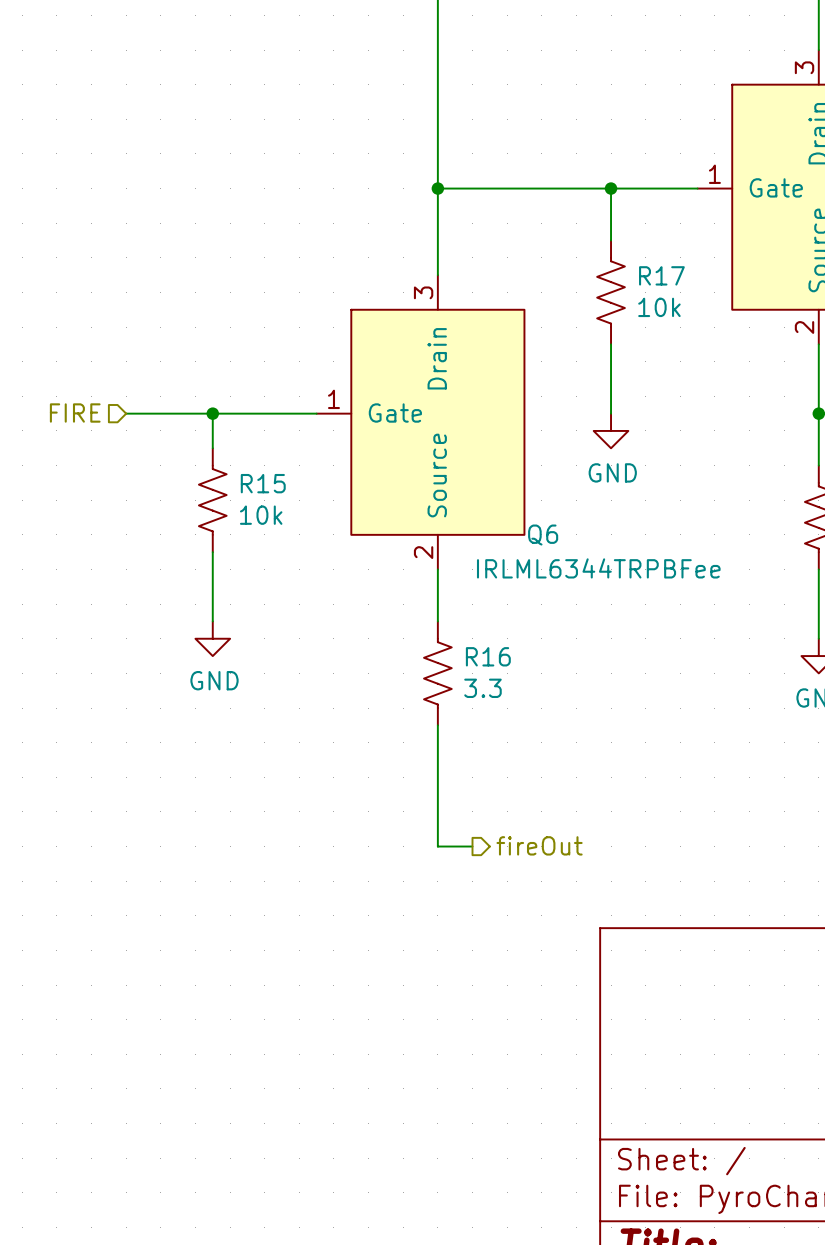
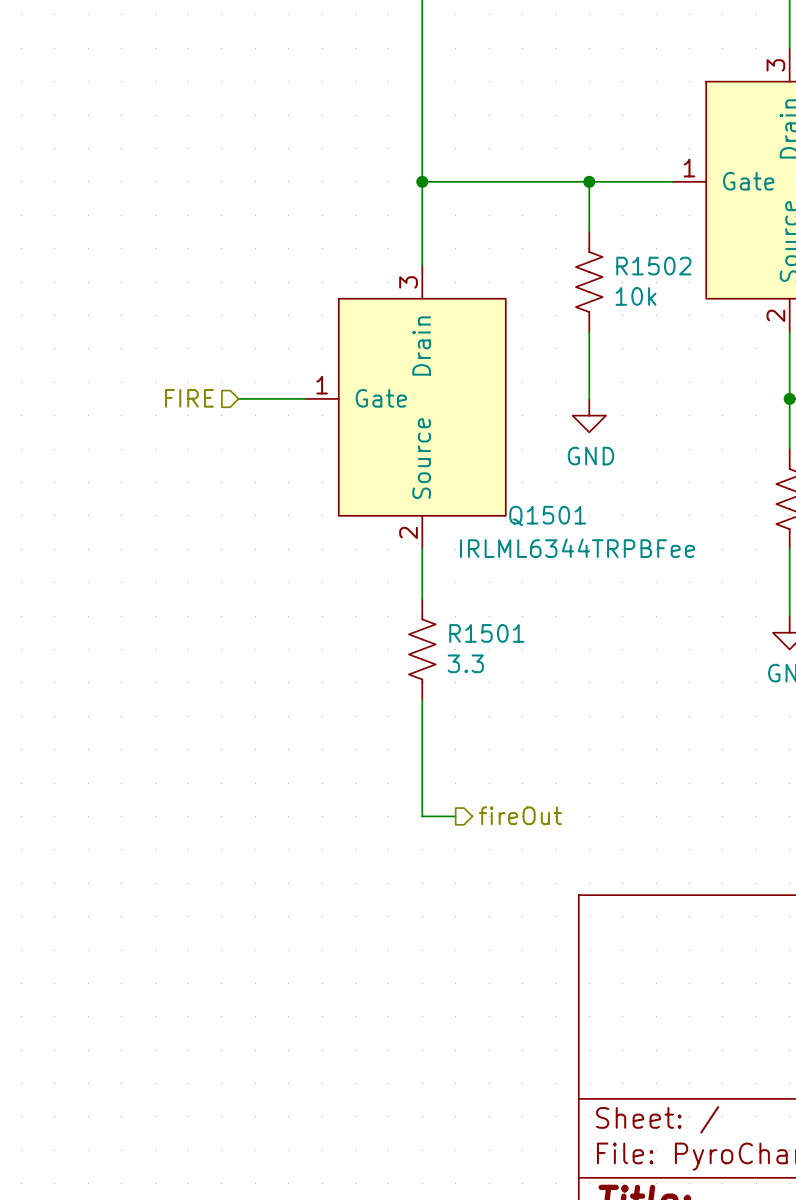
R17 name: R17 (661, 275) -> R1502 (653, 266)
hierarchical label position: FIRE (75, 413) -> FIRE (189, 398)
wire: (126, 413) (247, 413) -> none
wire: (212, 413) (212, 448) -> none
junction: (212, 413) -> none
R15: 10k (212, 500) -> none
Q6 name: Q6 (543, 535) -> Q1501 (547, 515)
wire: (212, 552) (212, 621) -> none
power symbol: GND (212, 638) -> none
R16 name: R16 (488, 656) -> R1501 (486, 633)

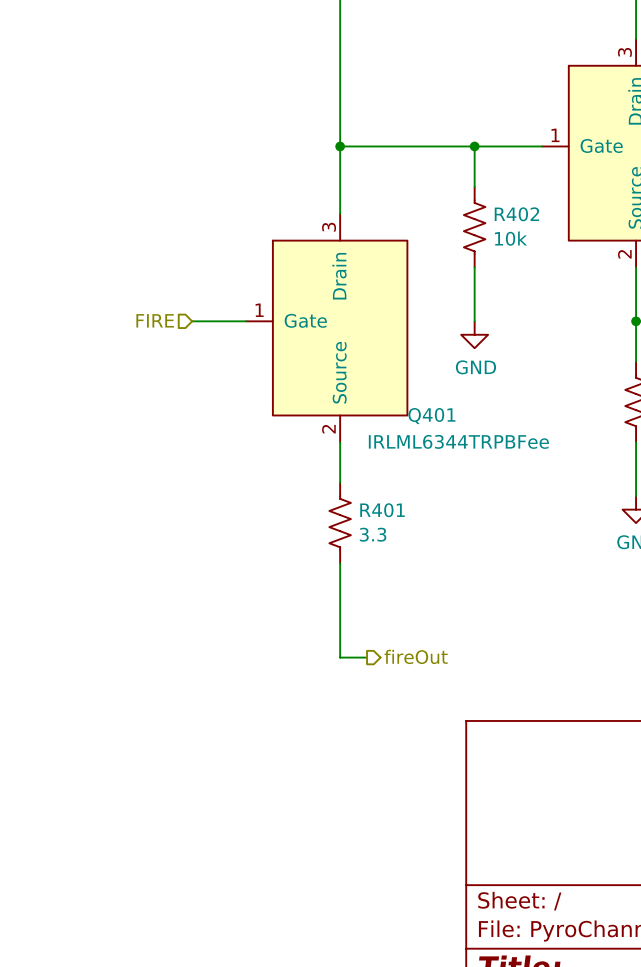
R1502 name: R1502 (653, 266) -> R402 (516, 214)
Q1501 name: Q1501 (547, 515) -> Q401 (431, 416)
R1501 name: R1501 (486, 633) -> R401 (382, 510)

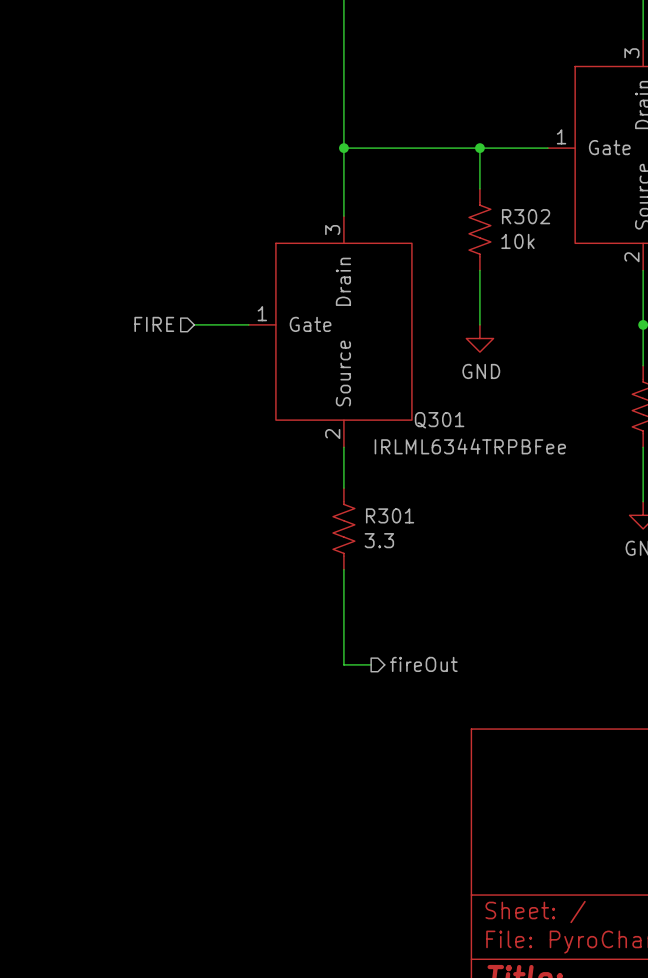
R402 name: R402 (516, 214) -> R302 (526, 216)
Q401 name: Q401 (431, 416) -> Q301 (439, 420)
R401 name: R401 (382, 510) -> R301 (390, 515)

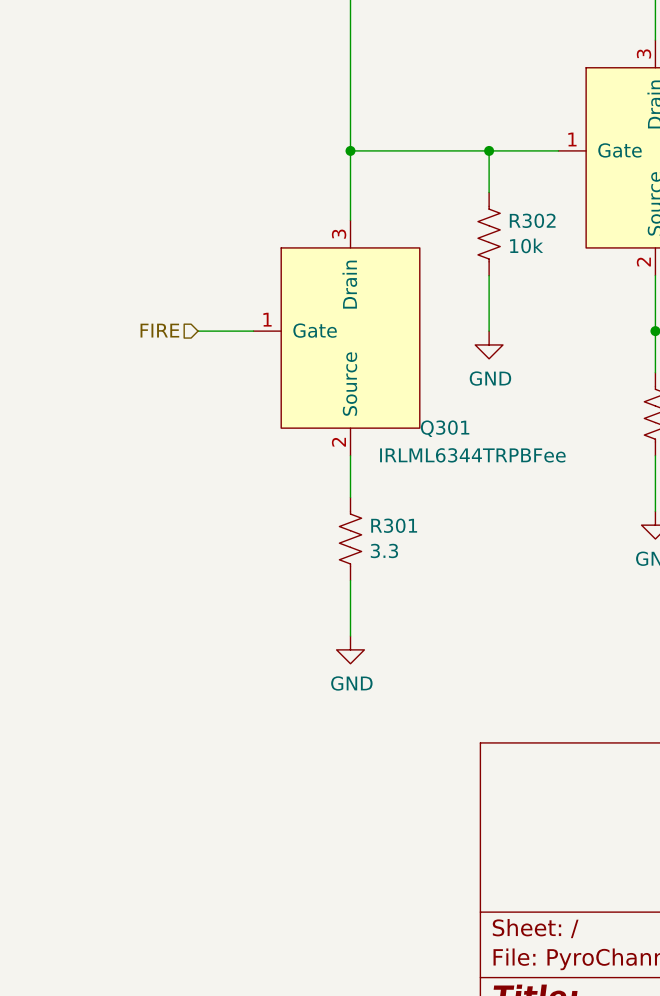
wire: (343, 624) (343, 664) (371, 664) -> none
power symbol: none -> GND (350, 649)
hierarchical label: fireOut (423, 664) -> none

